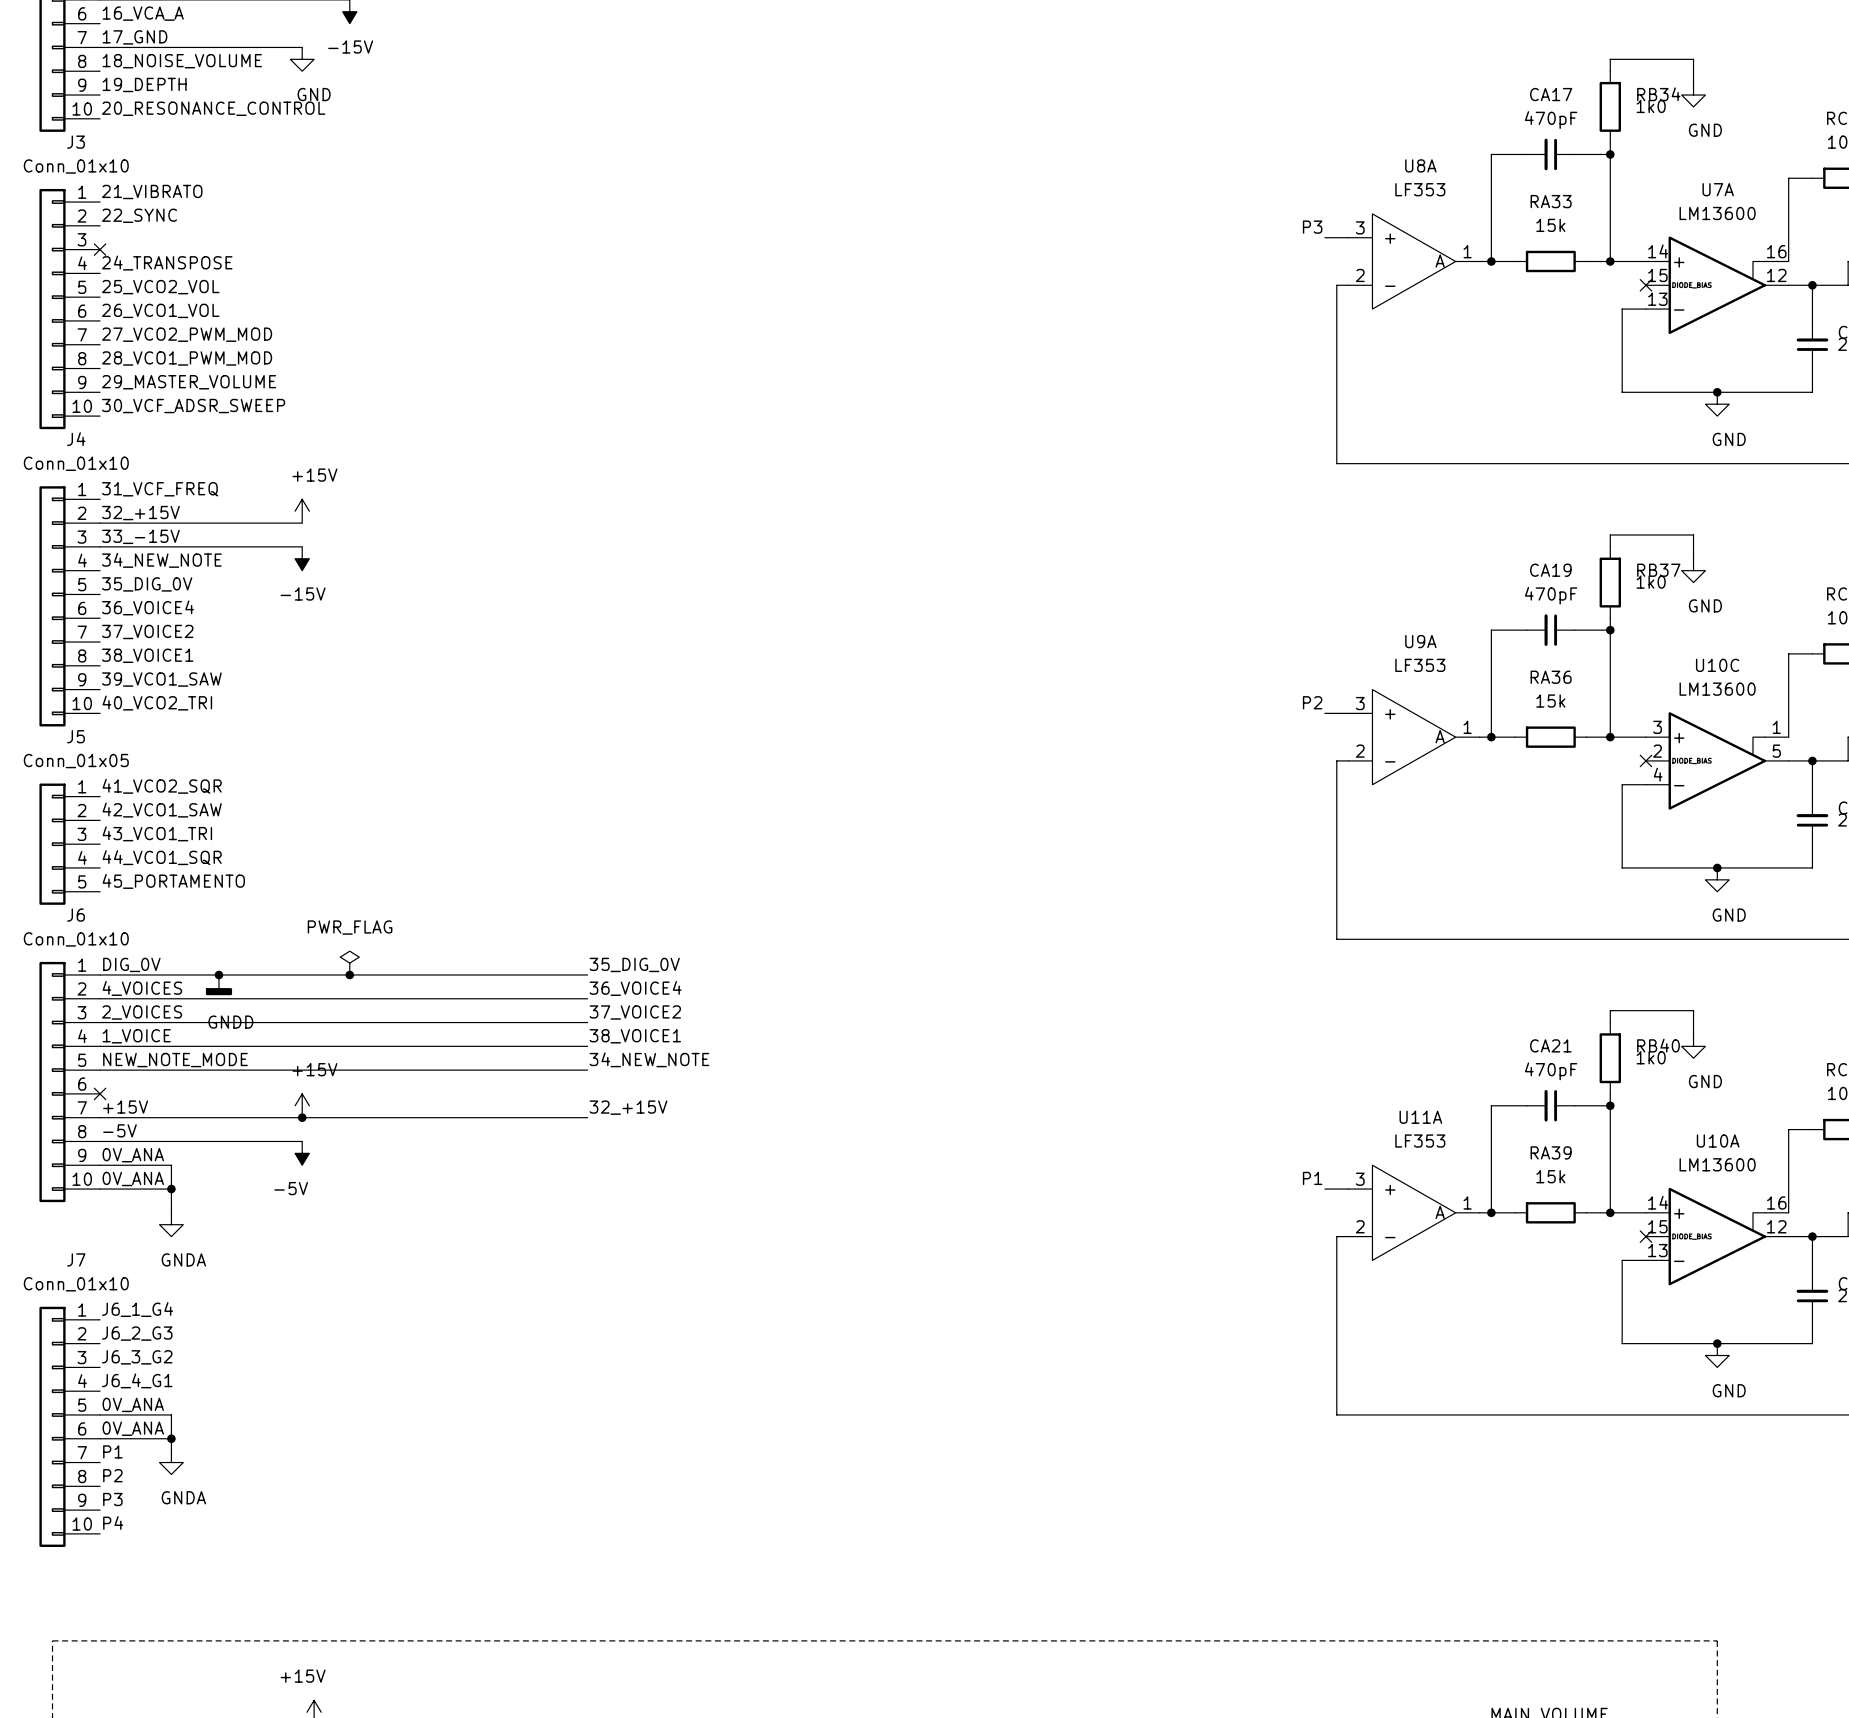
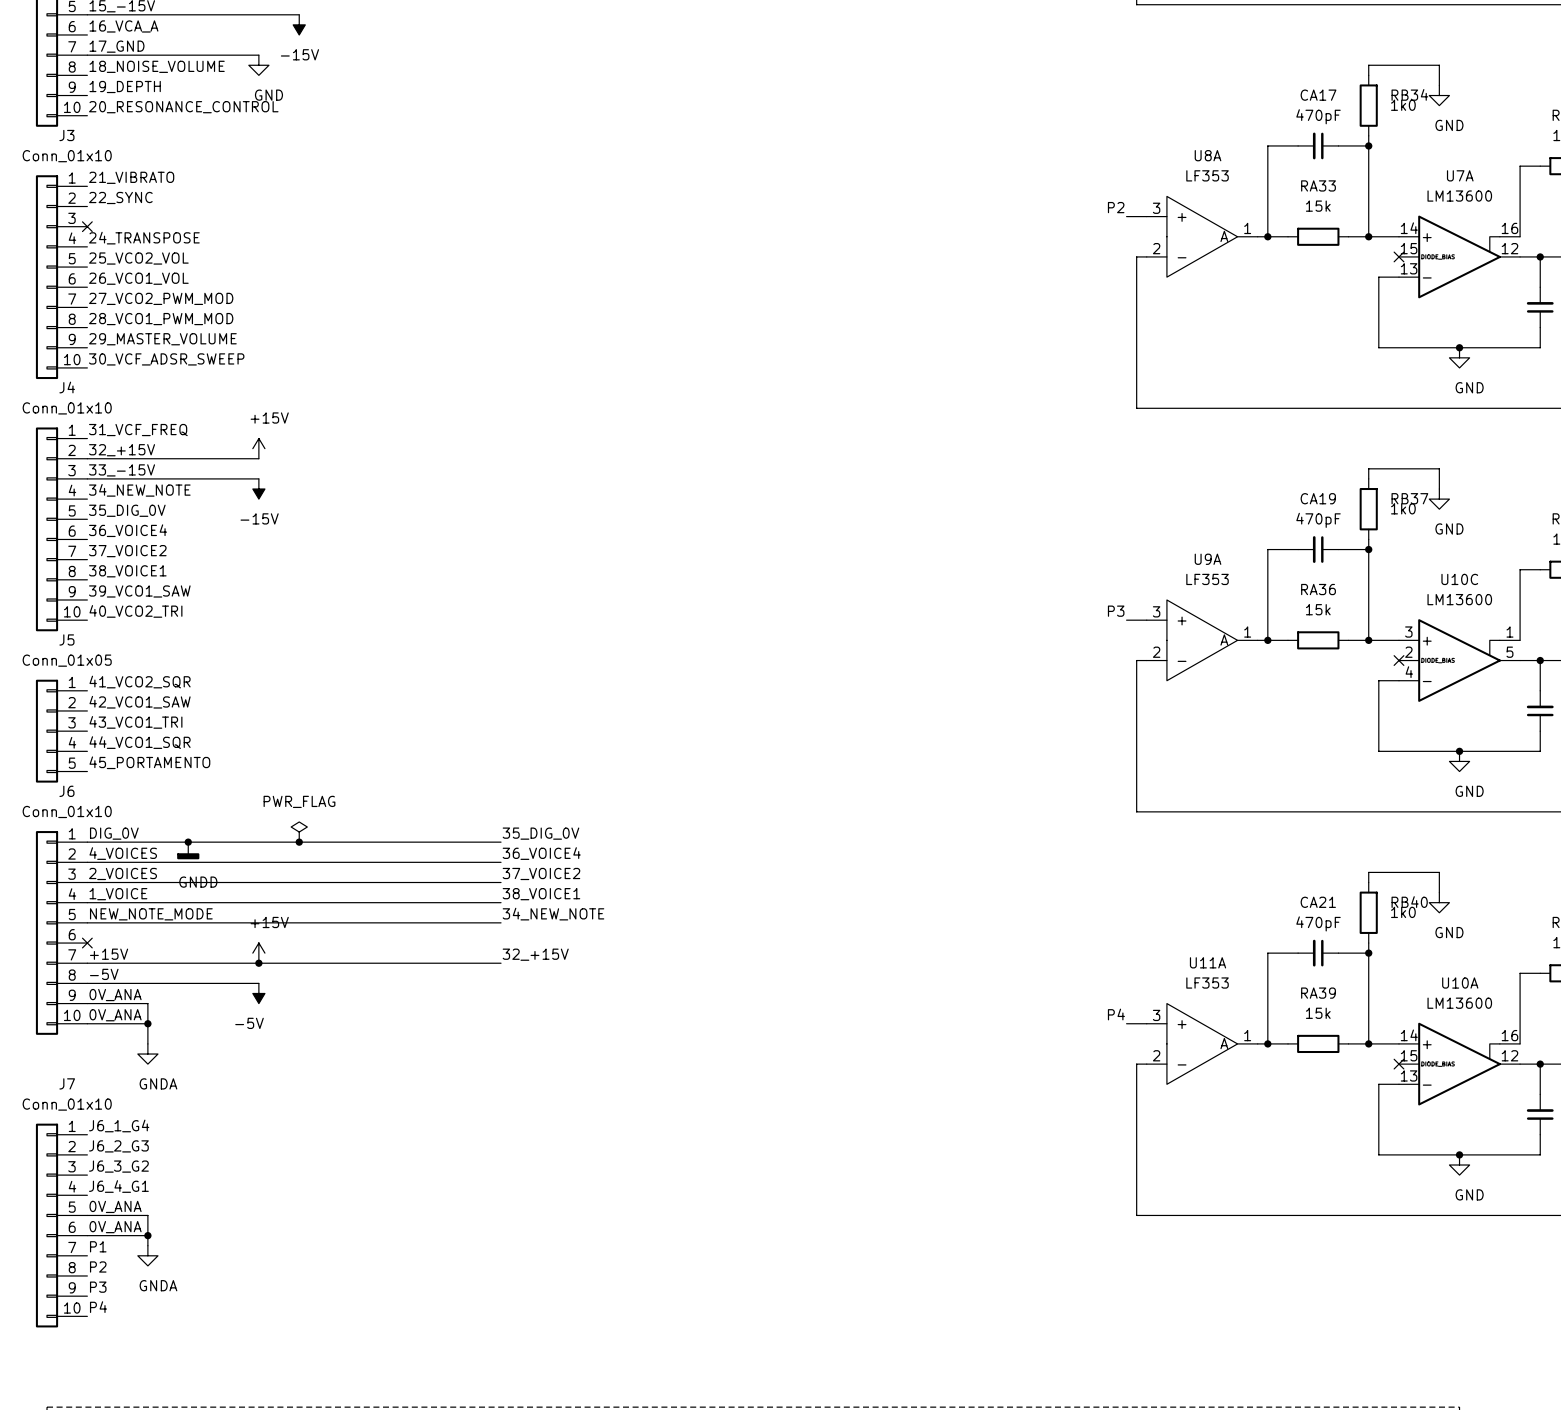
label: P3 (1312, 227) -> P2 (1116, 207)
label: P2 (1312, 702) -> P3 (1116, 611)
label: P1 (1312, 1178) -> P4 (1116, 1014)

